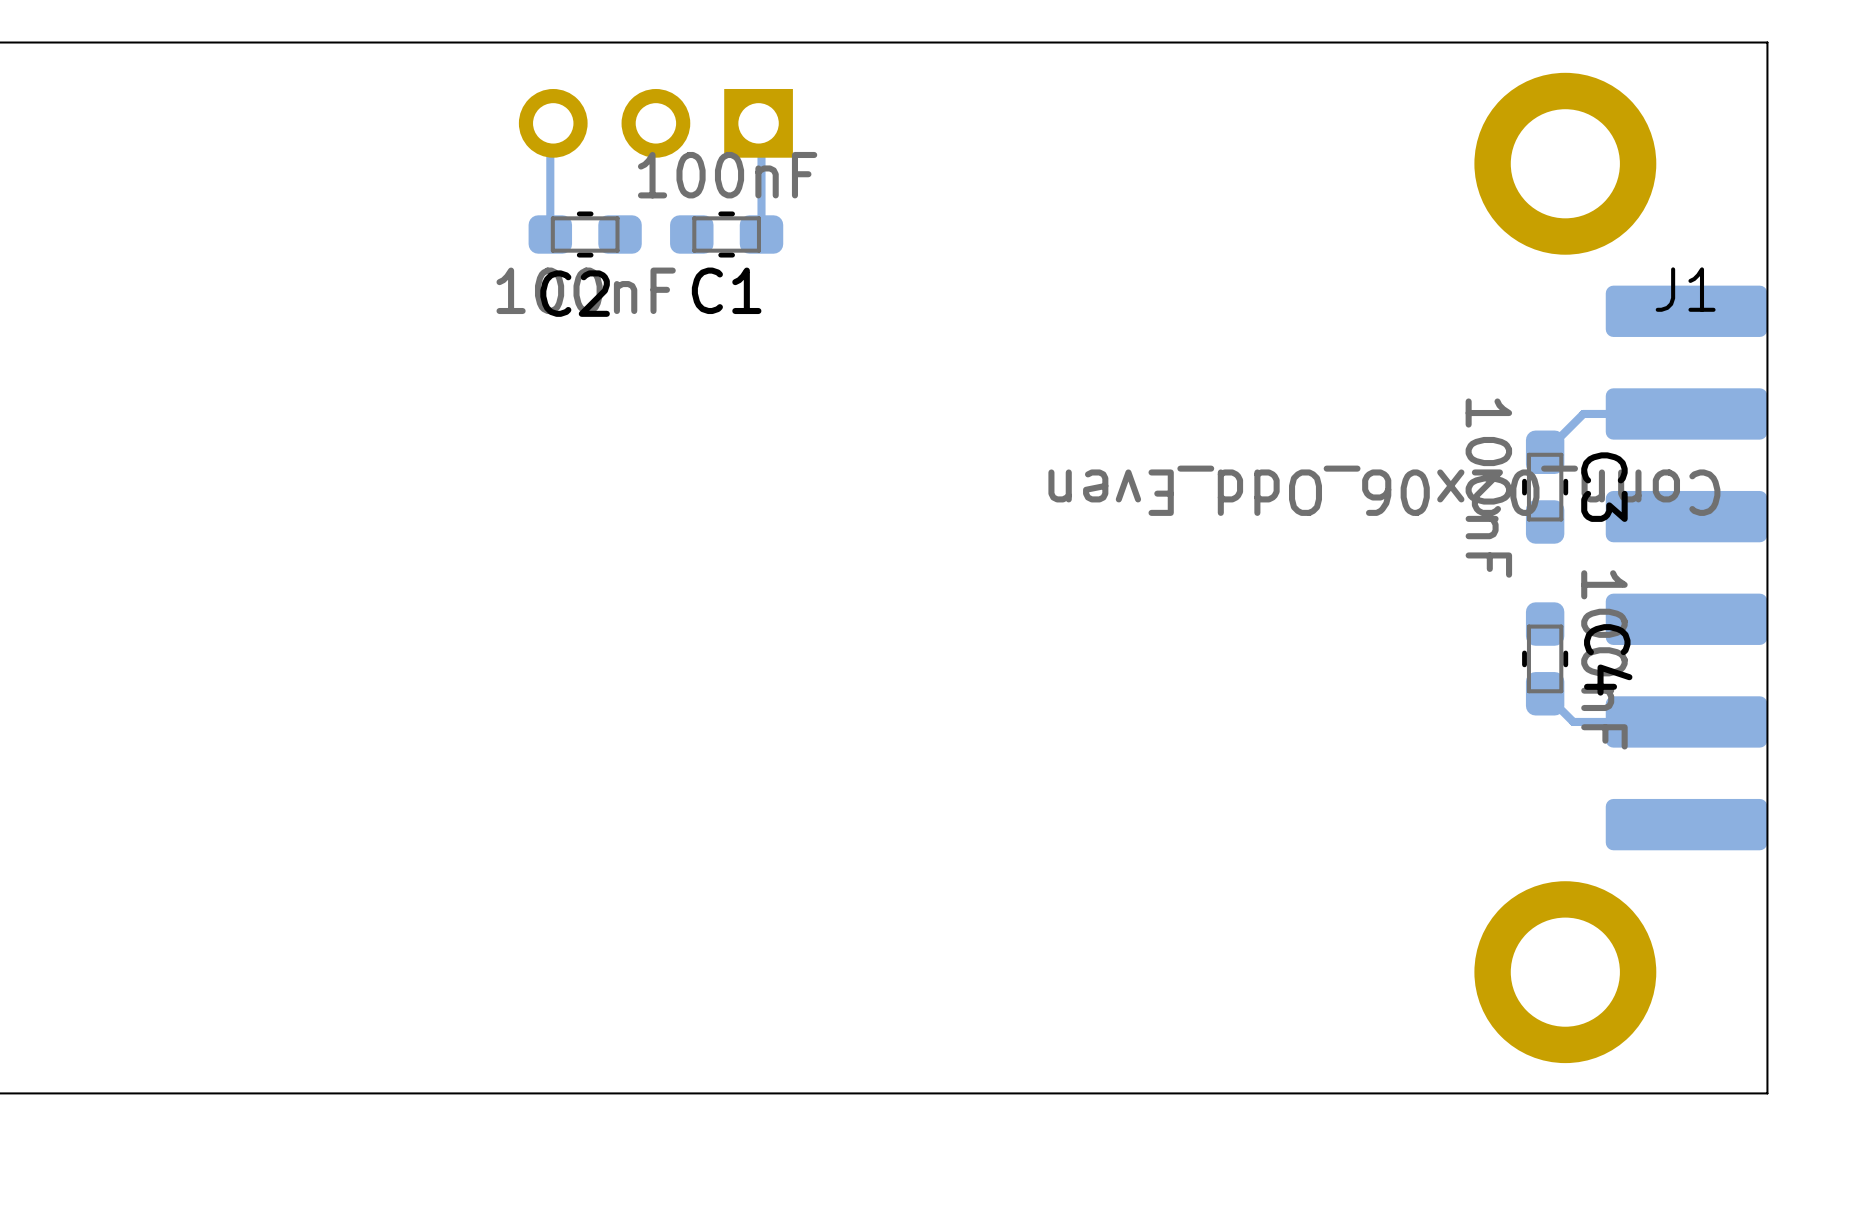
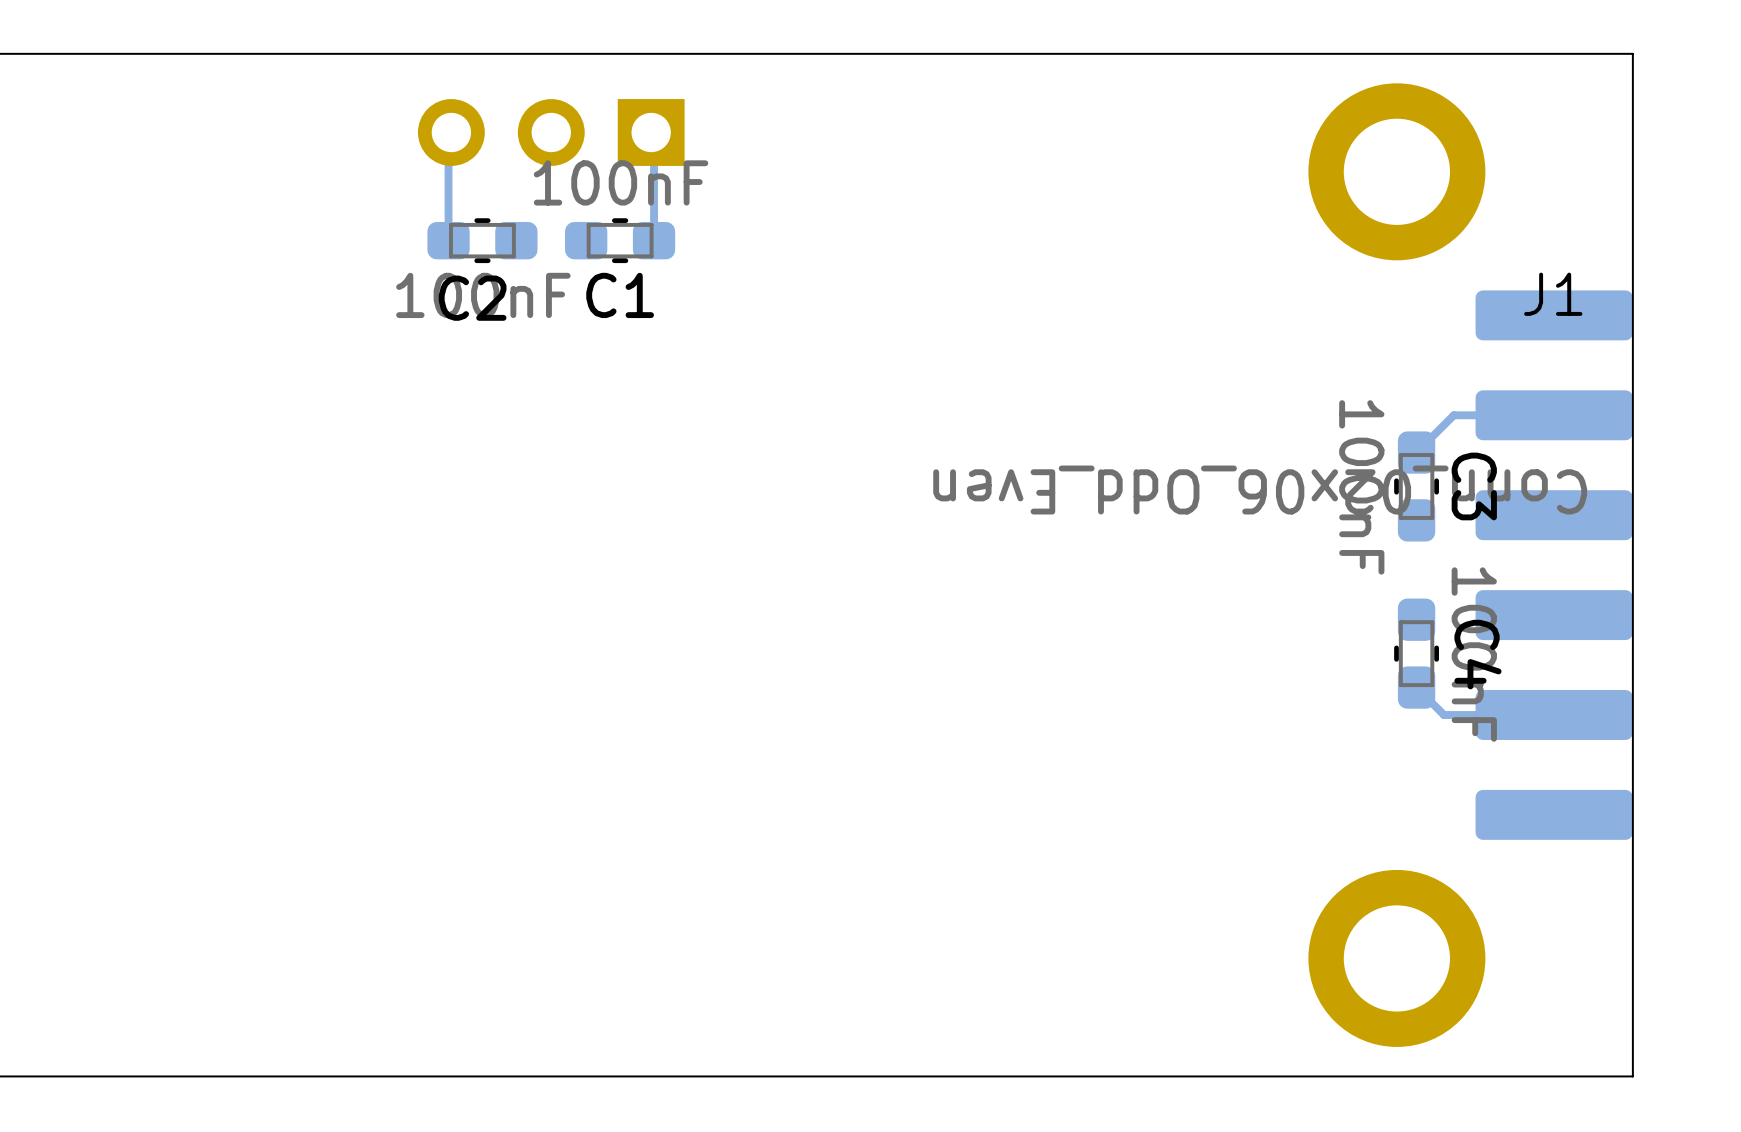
part position: (1565, 163) -> (1396, 171)
part position: (1565, 972) -> (1396, 958)

